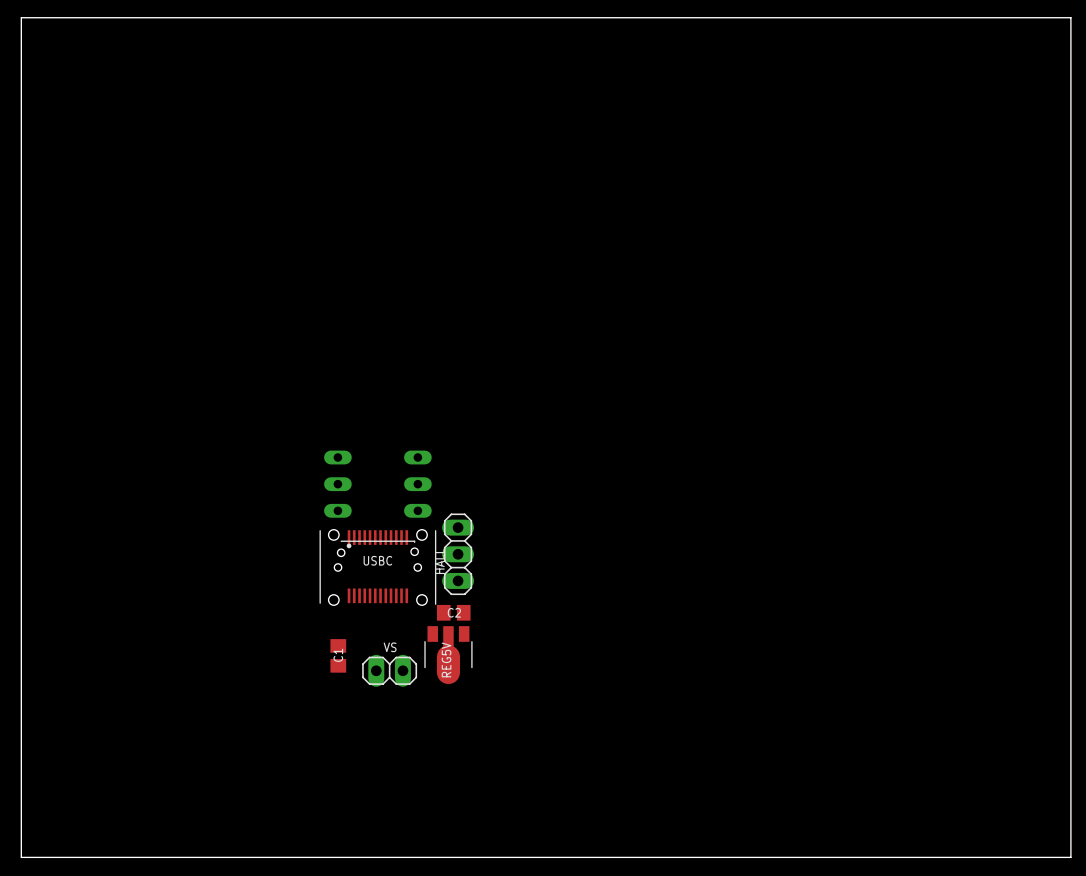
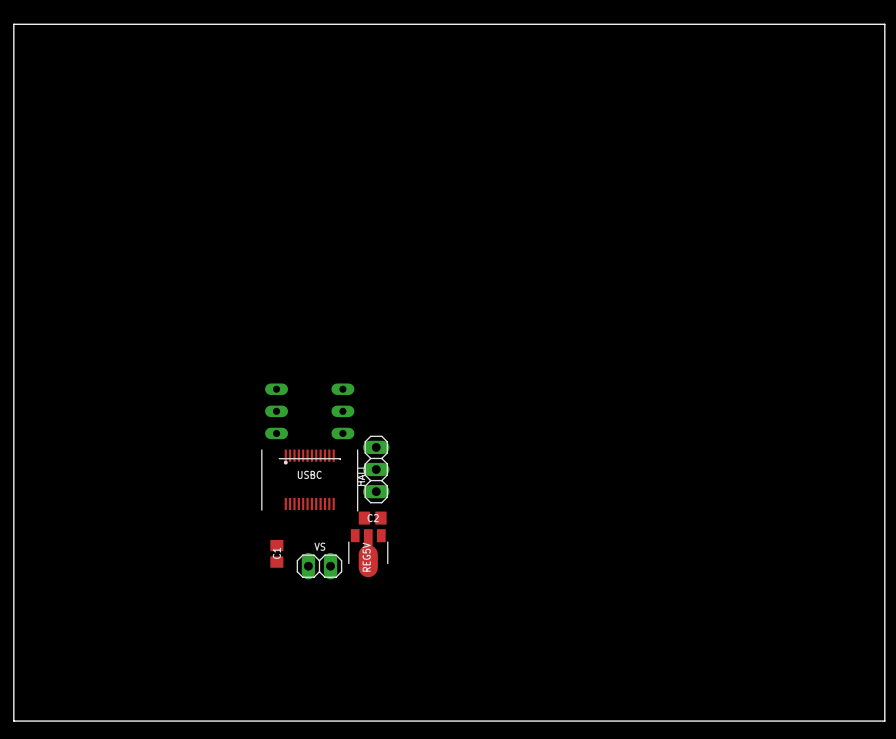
USBC footprint: [319, 529, 437, 606] -> [261, 449, 359, 512]

